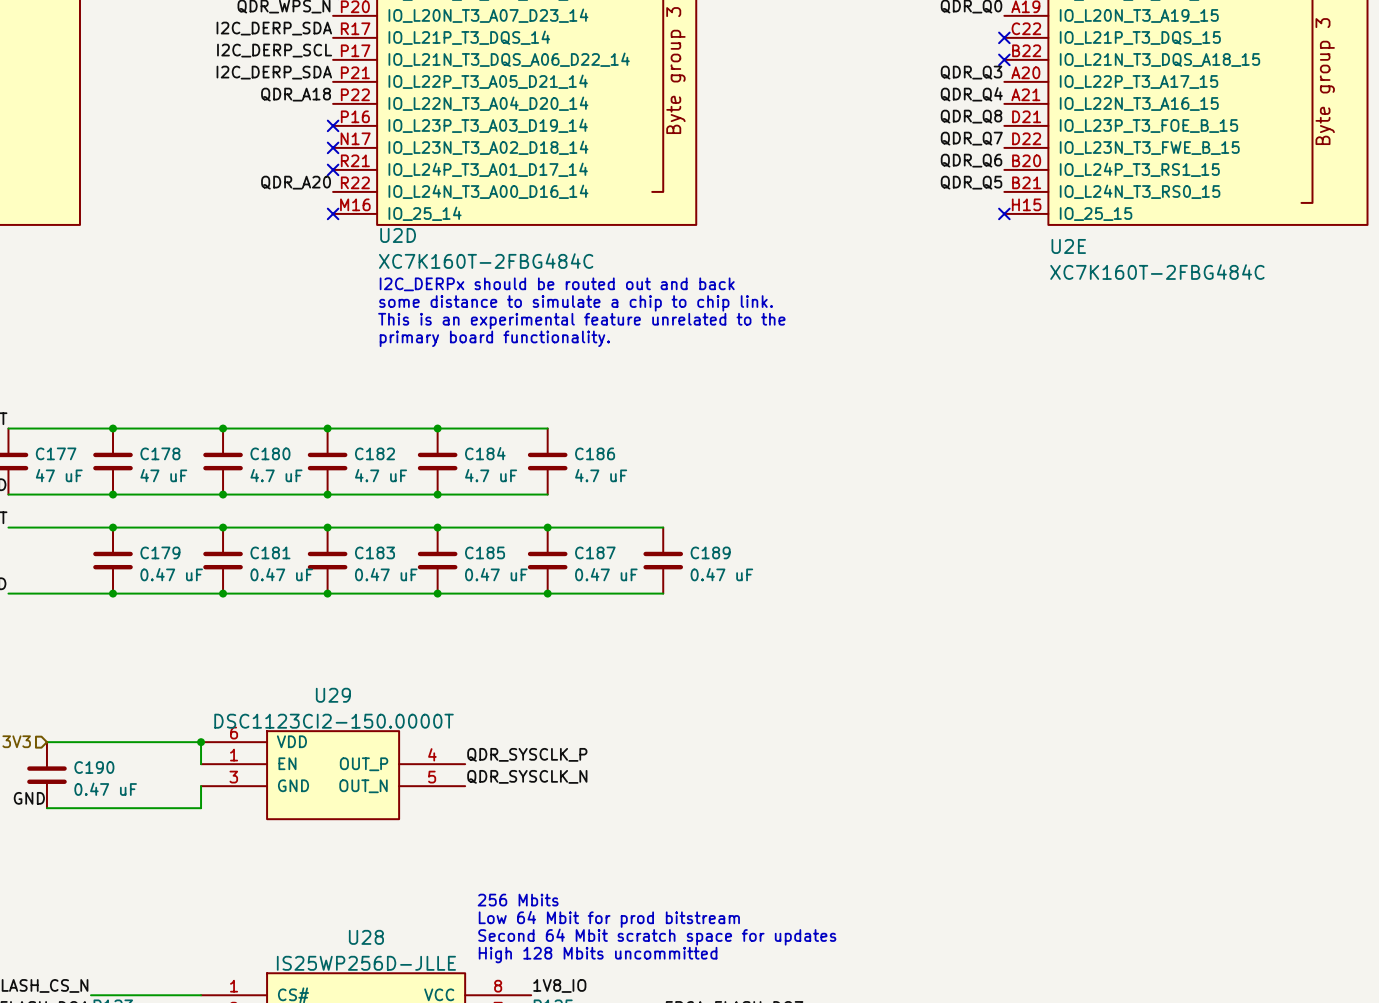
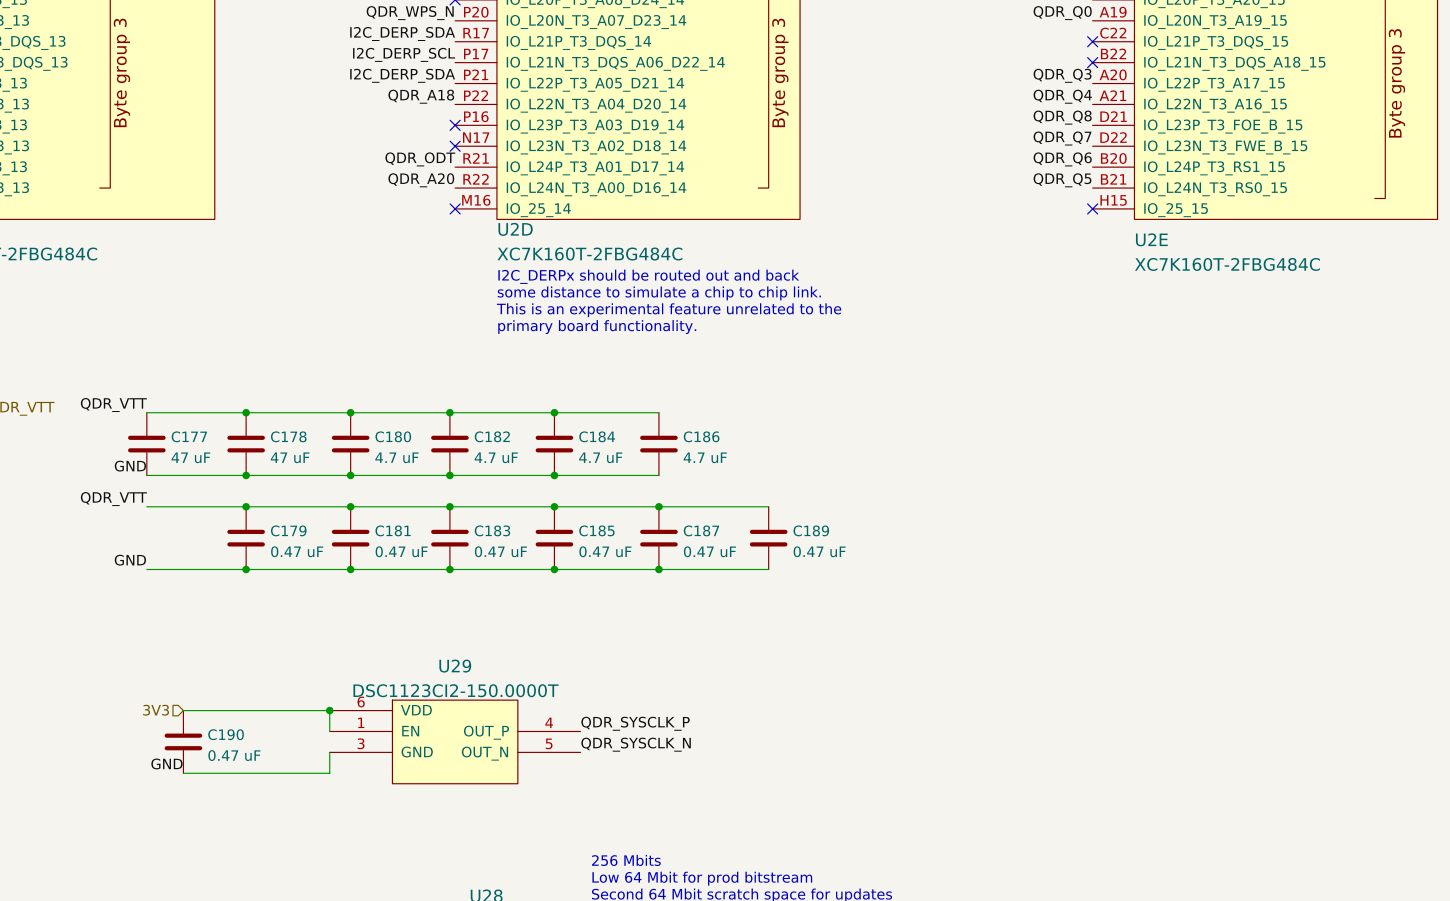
label: none -> QDR_ODT (420, 159)
no-connect mark: (333, 169) -> none

